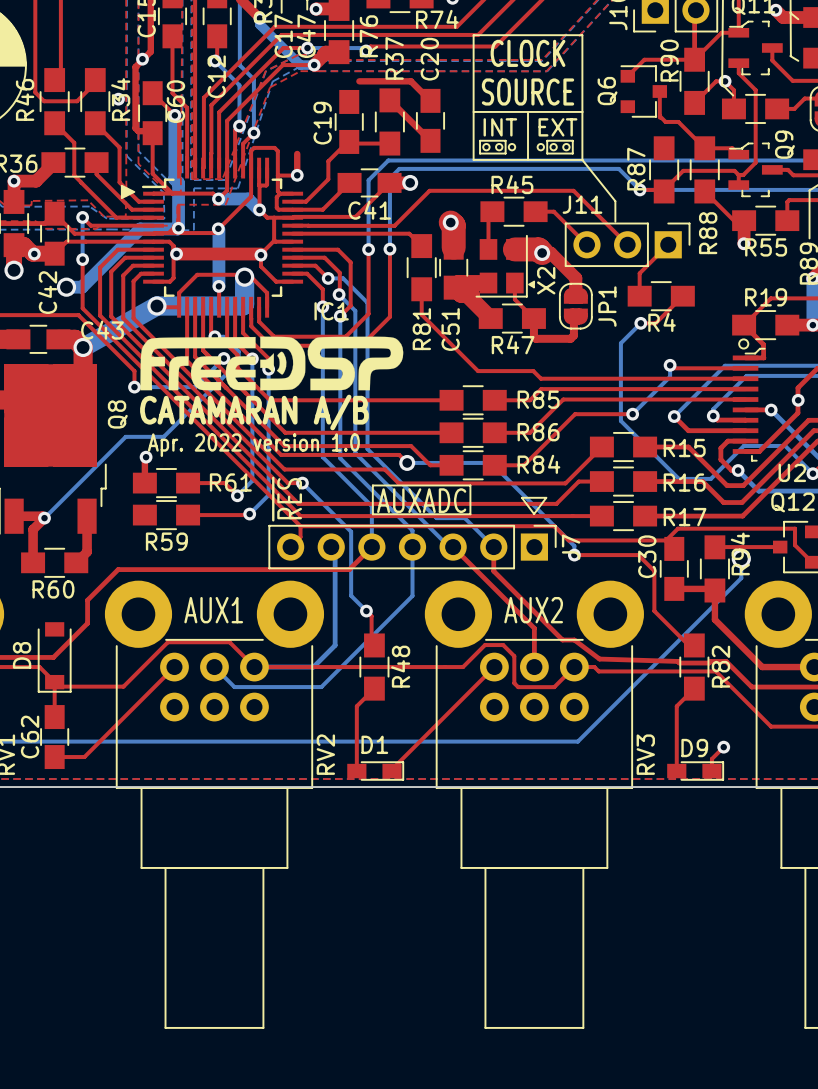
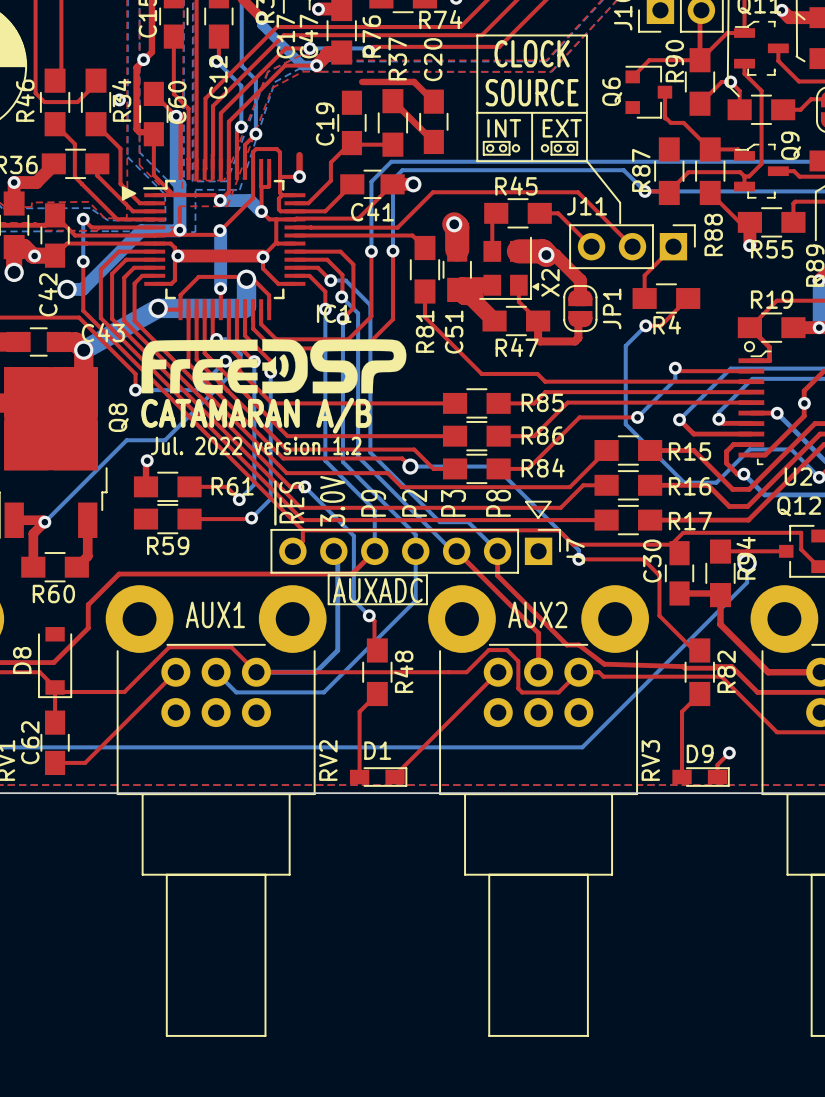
text: Apr. 2022 version 1.0 (253, 445) -> Jul. 2022 version 1.2 (256, 445)
line: (372, 485) (470, 485) (470, 514) (372, 514) (372, 485) -> (328, 575) (426, 575) (426, 604) (328, 604) (328, 575)
text: none -> 3.0V (332, 501)
text: none -> P9 (373, 503)
text: none -> P3 (453, 503)
text: none -> P8 (498, 503)
text: AUXADC (421, 500) -> P2 (414, 503)
text: none -> AUXADC (377, 590)

